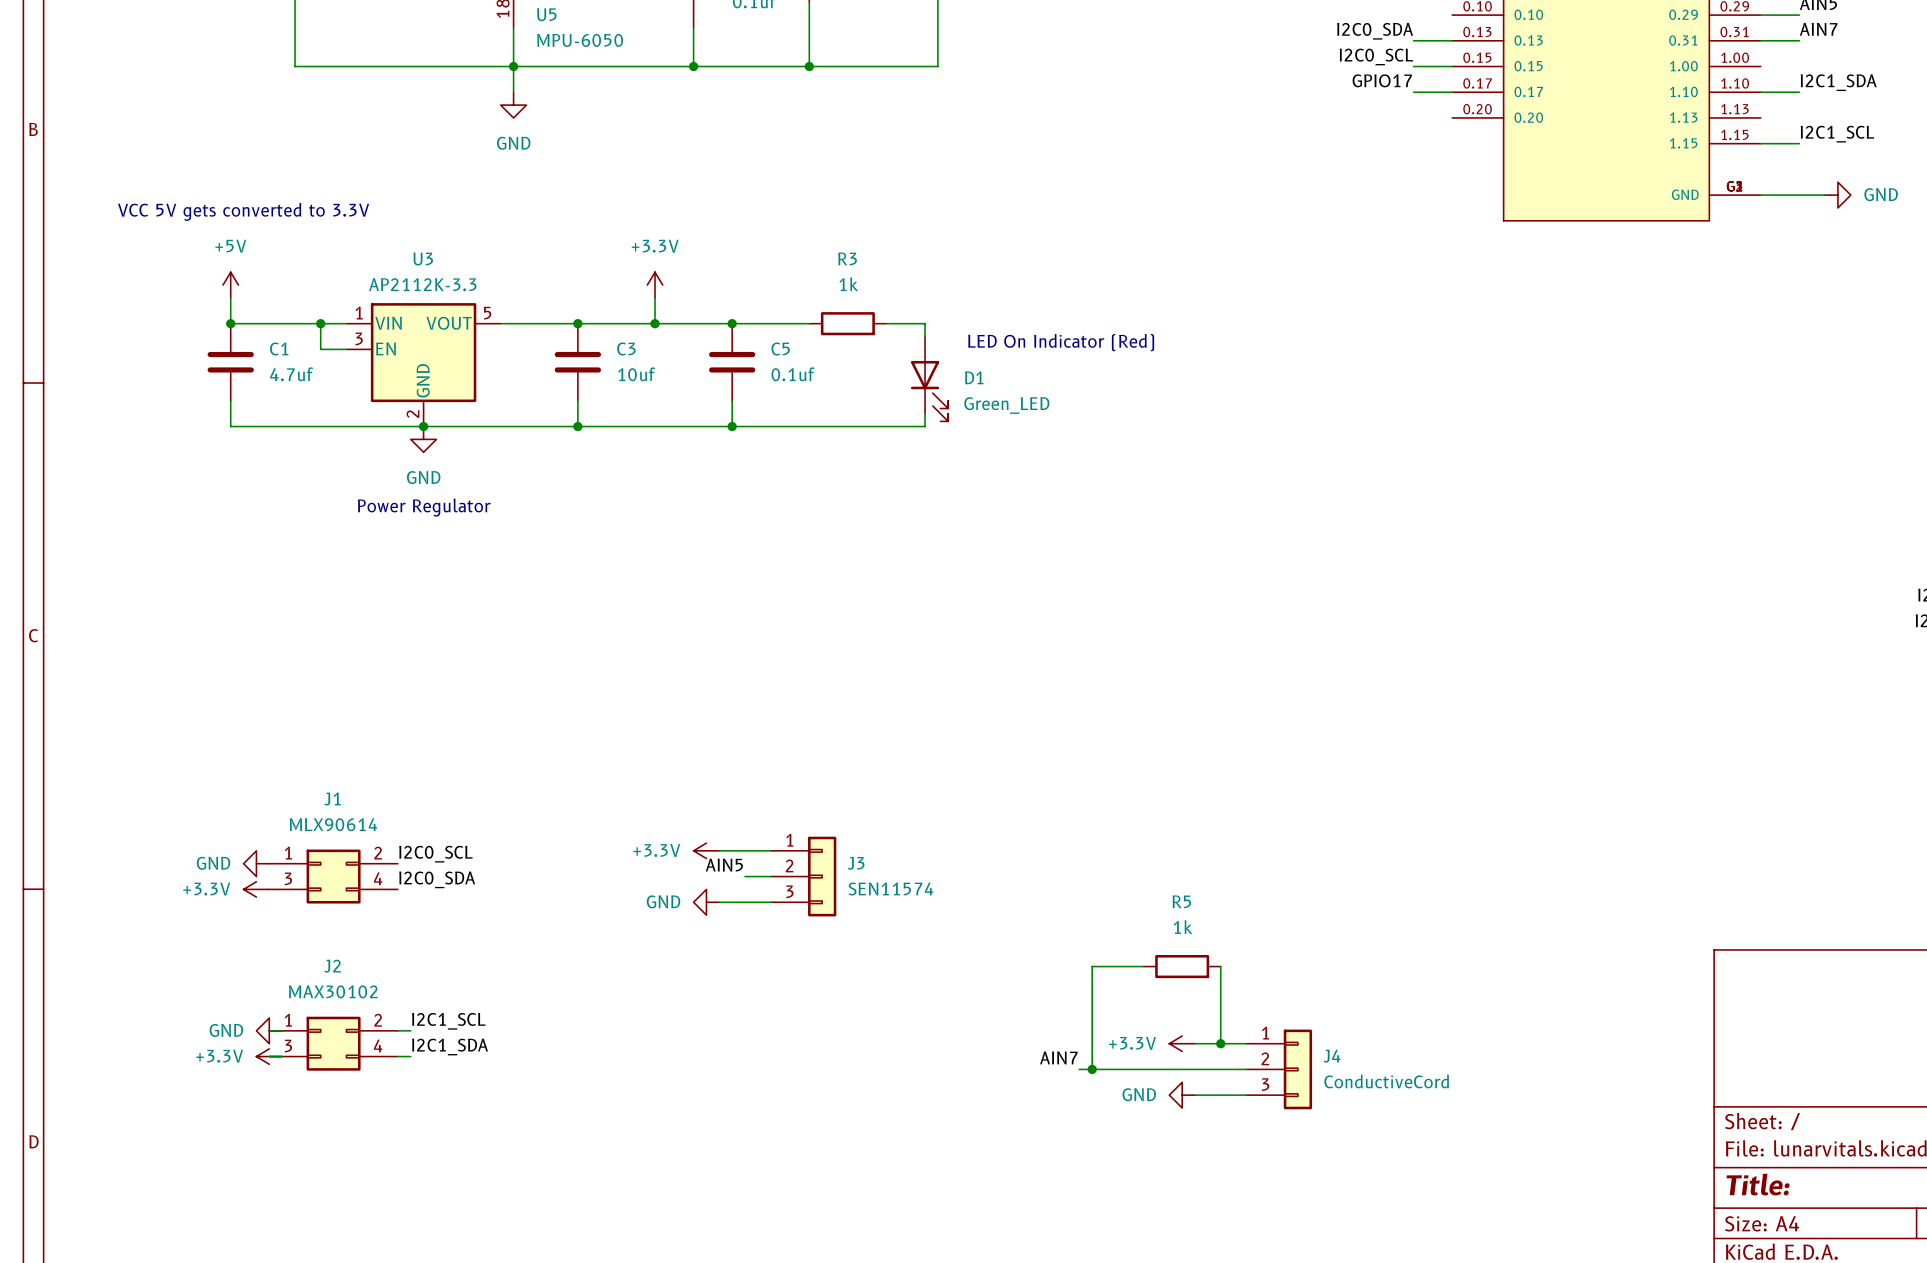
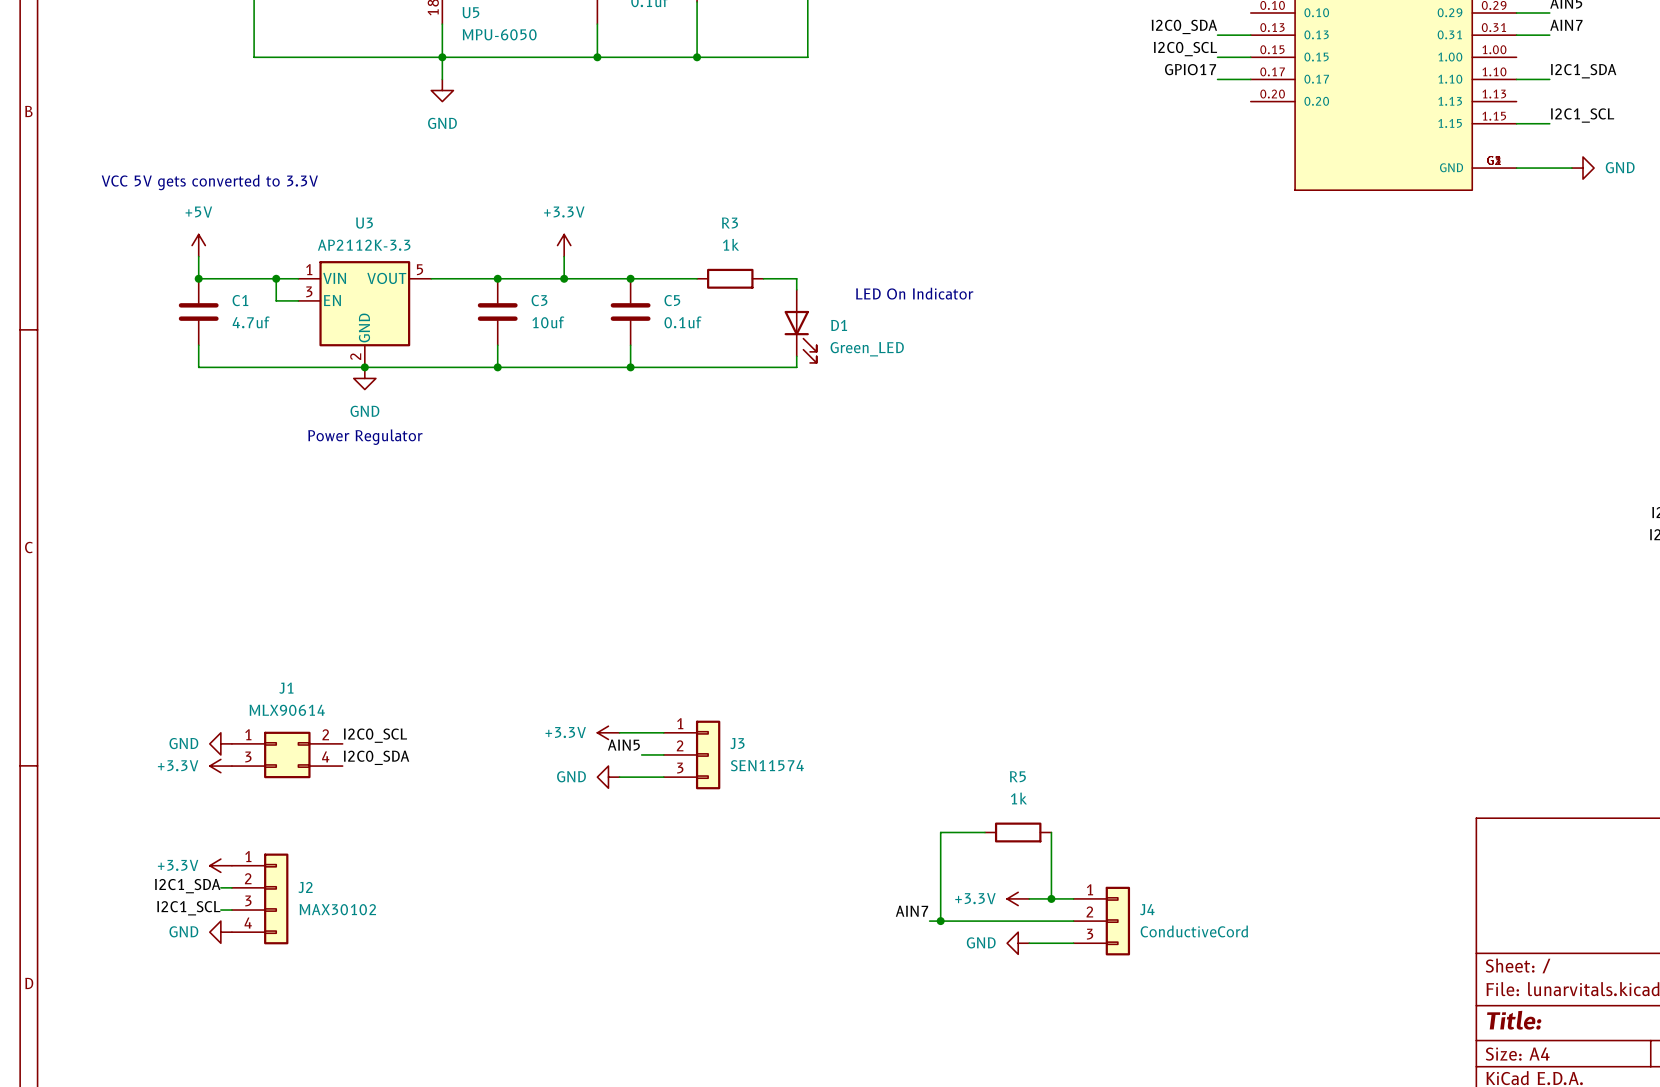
text: LED On Indicator (Red) (1061, 342) -> LED On Indicator (914, 293)
J2 name position: J2 (332, 966) -> J2 (305, 887)
J2 value position: MAX30102 (333, 991) -> MAX30102 (337, 909)
J2 symbol: [269, 1016, 398, 1071] -> [231, 853, 289, 945]
label position: I2C1_SCL (448, 1021) -> I2C1_SCL (188, 908)
power symbol position: GND (269, 1030) -> GND (220, 932)
wire: (397, 1030) (410, 1030) -> none
label position: I2C1_SDA (450, 1047) -> I2C1_SDA (187, 886)
power symbol position: +3.3V (269, 1056) -> +3.3V (220, 865)
wire: (397, 1056) (410, 1056) -> none

